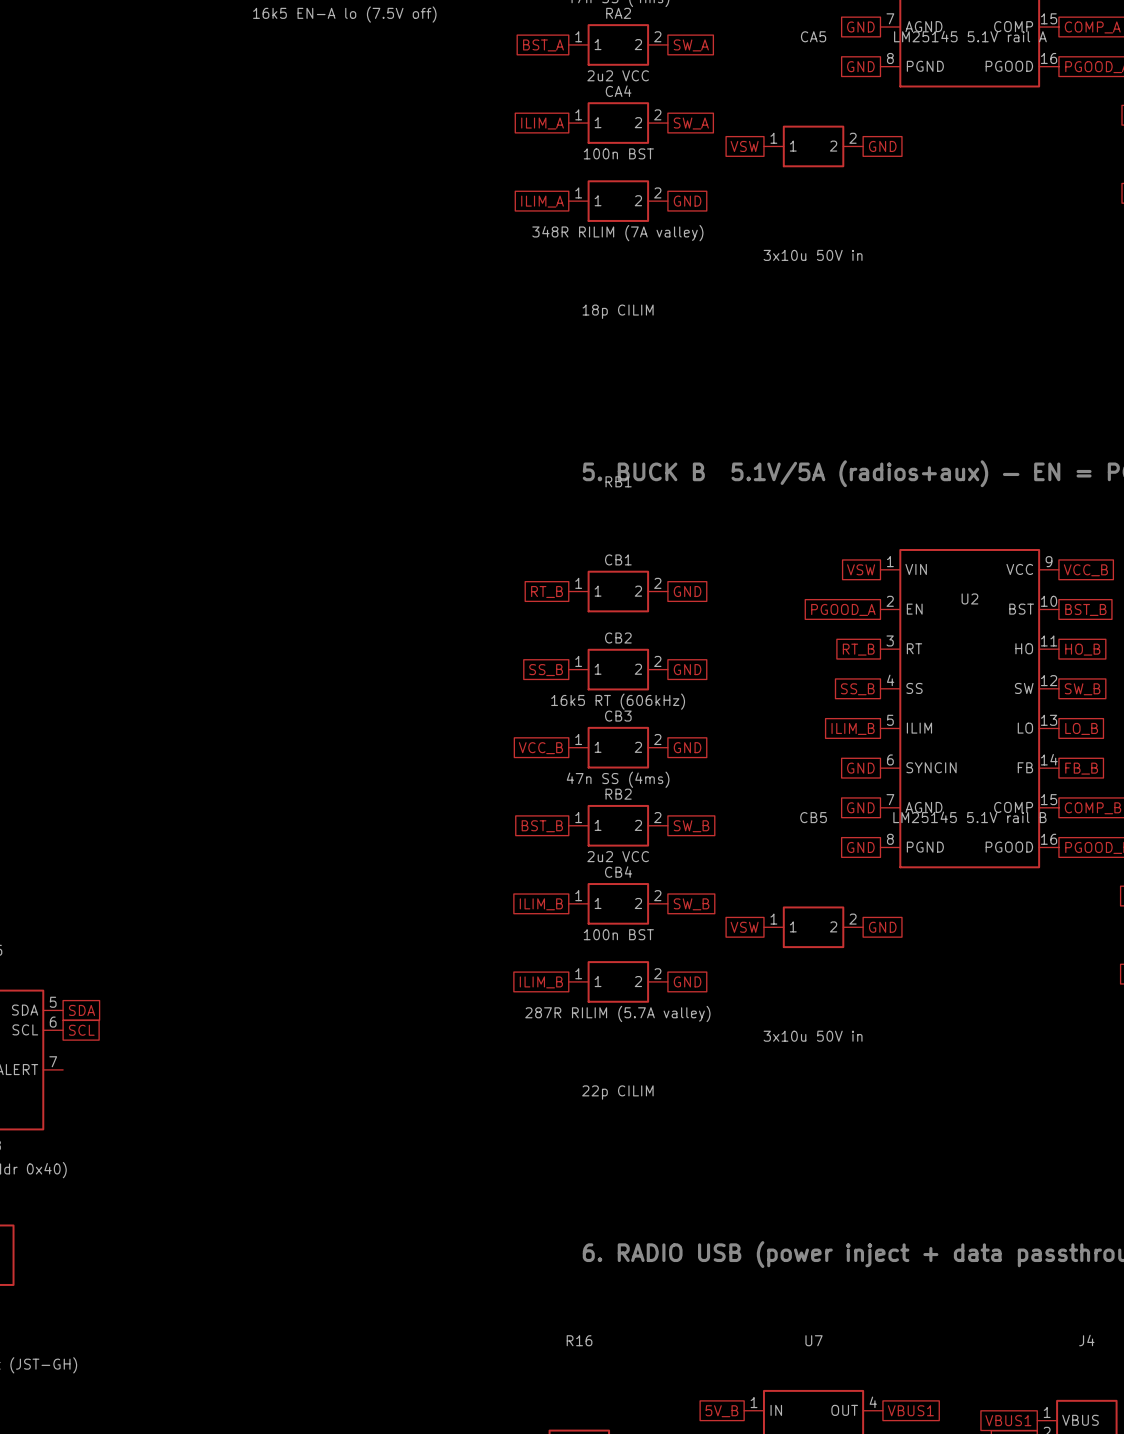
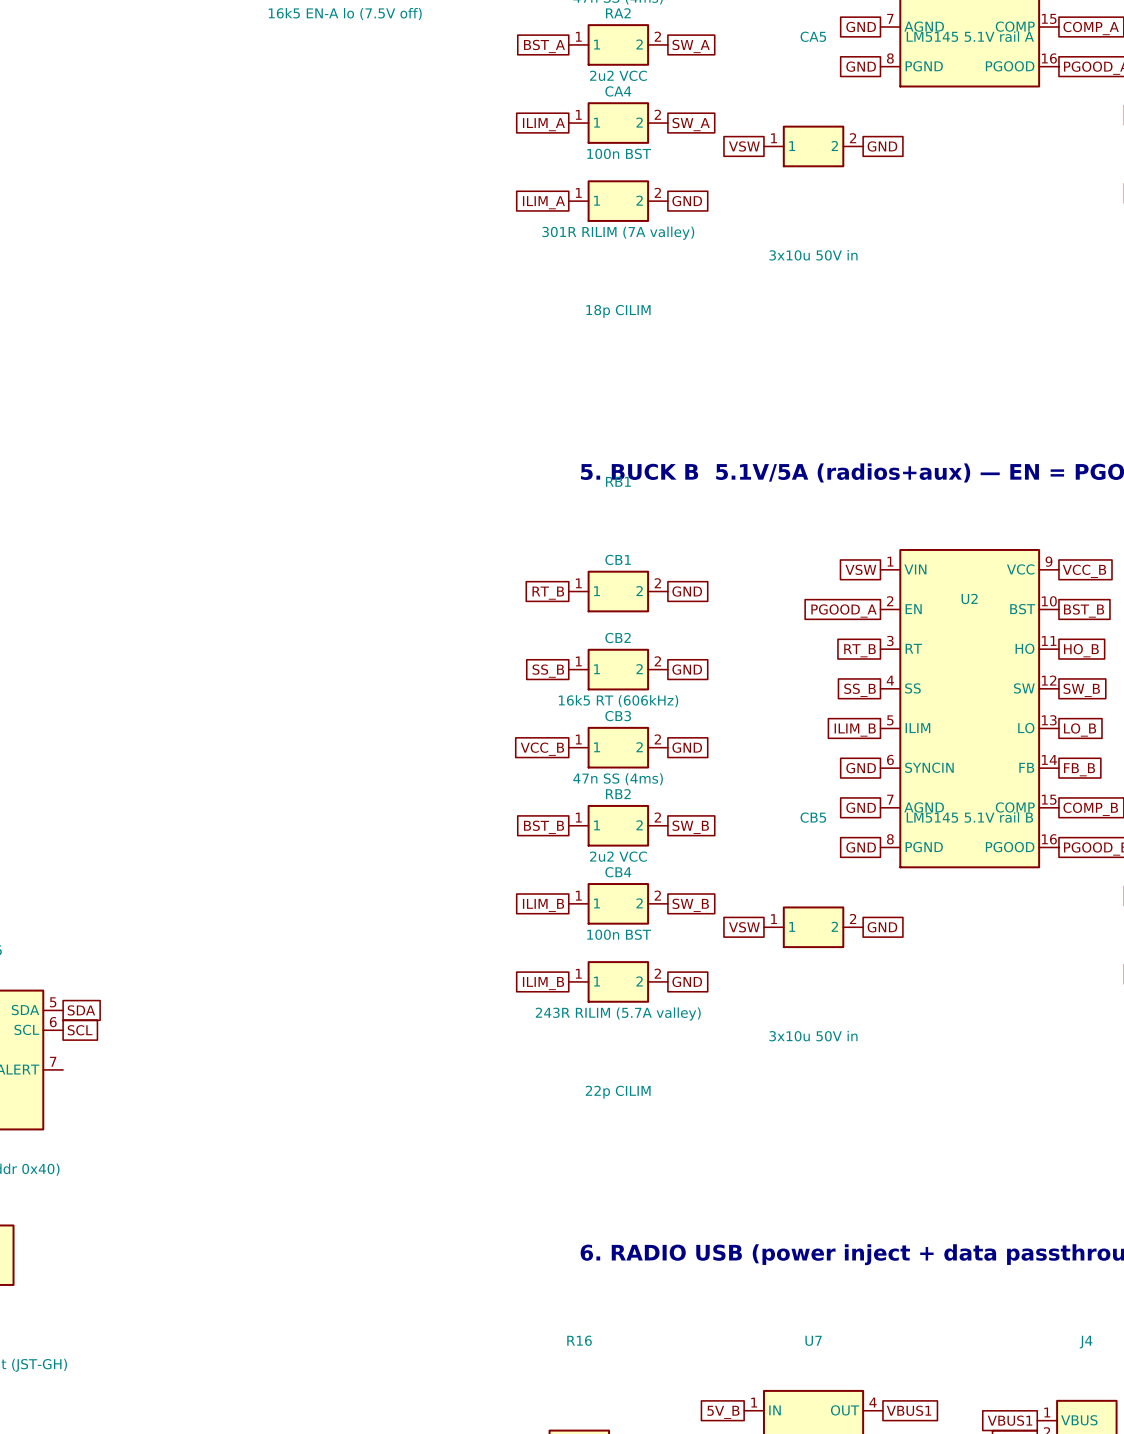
part value: LM25145 5.1V rail A (970, 36) -> LM5145 5.1V rail A (970, 36)
RA2 value: 348R RILIM (7A valley) (617, 233) -> 301R RILIM (7A valley) (618, 233)
U2 value: LM25145 5.1V rail B (969, 817) -> LM5145 5.1V rail B (969, 817)
RB2 value: 287R RILIM (5.7A valley) (617, 1013) -> 243R RILIM (5.7A valley) (618, 1014)

